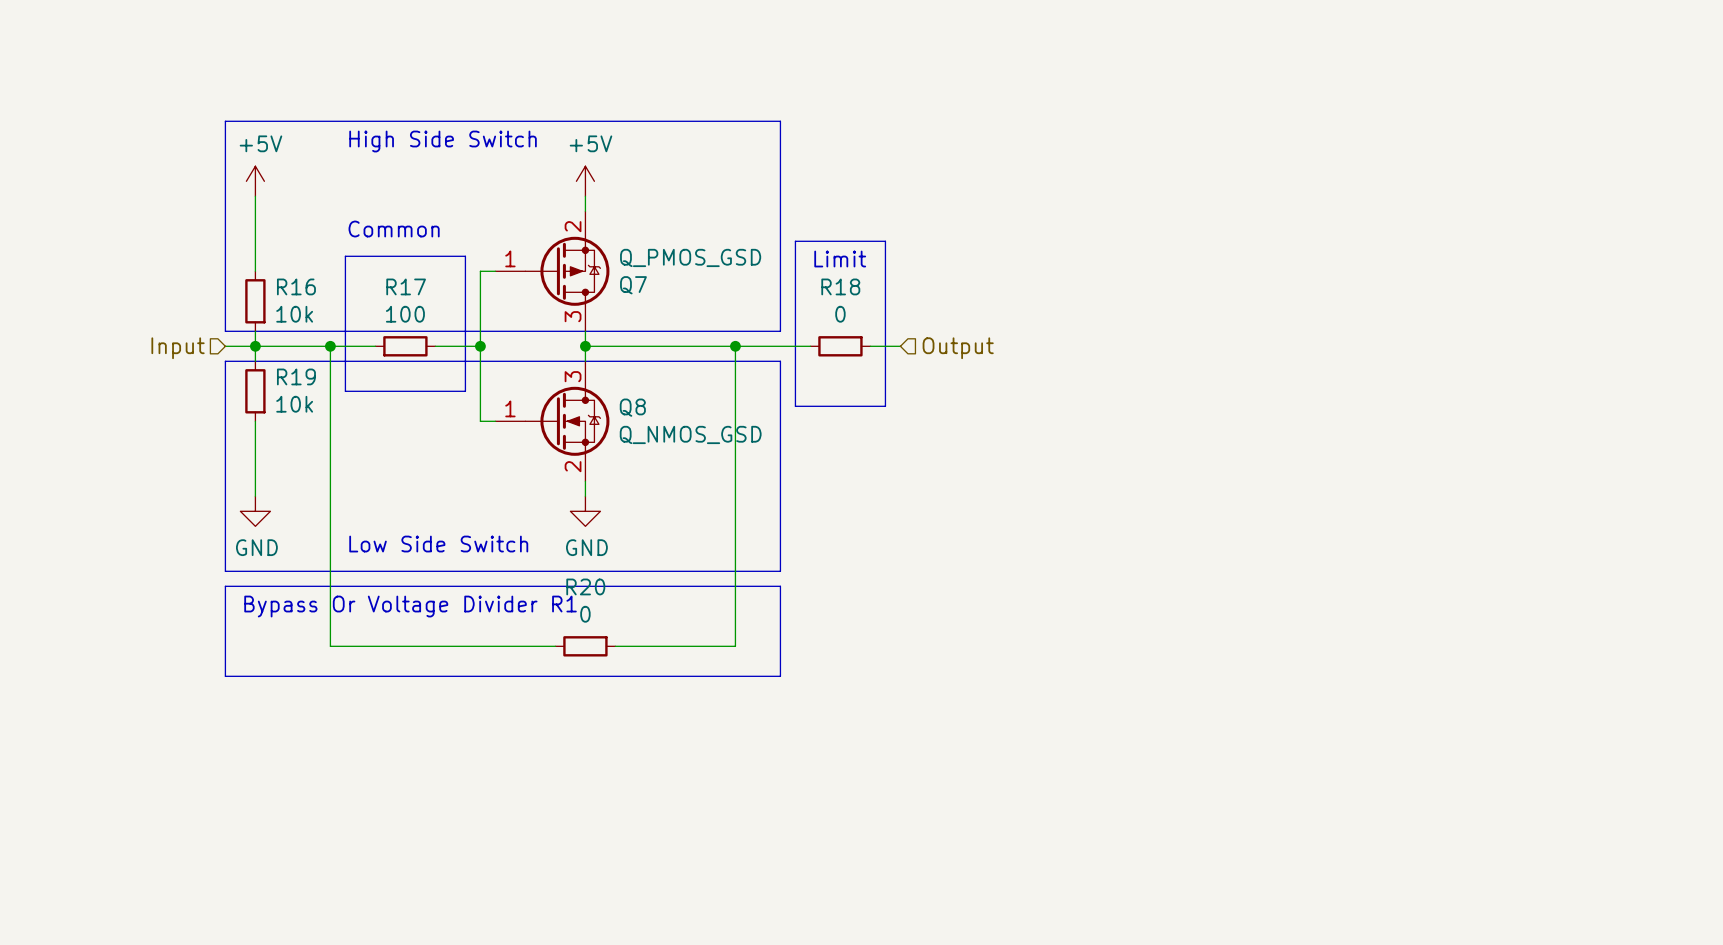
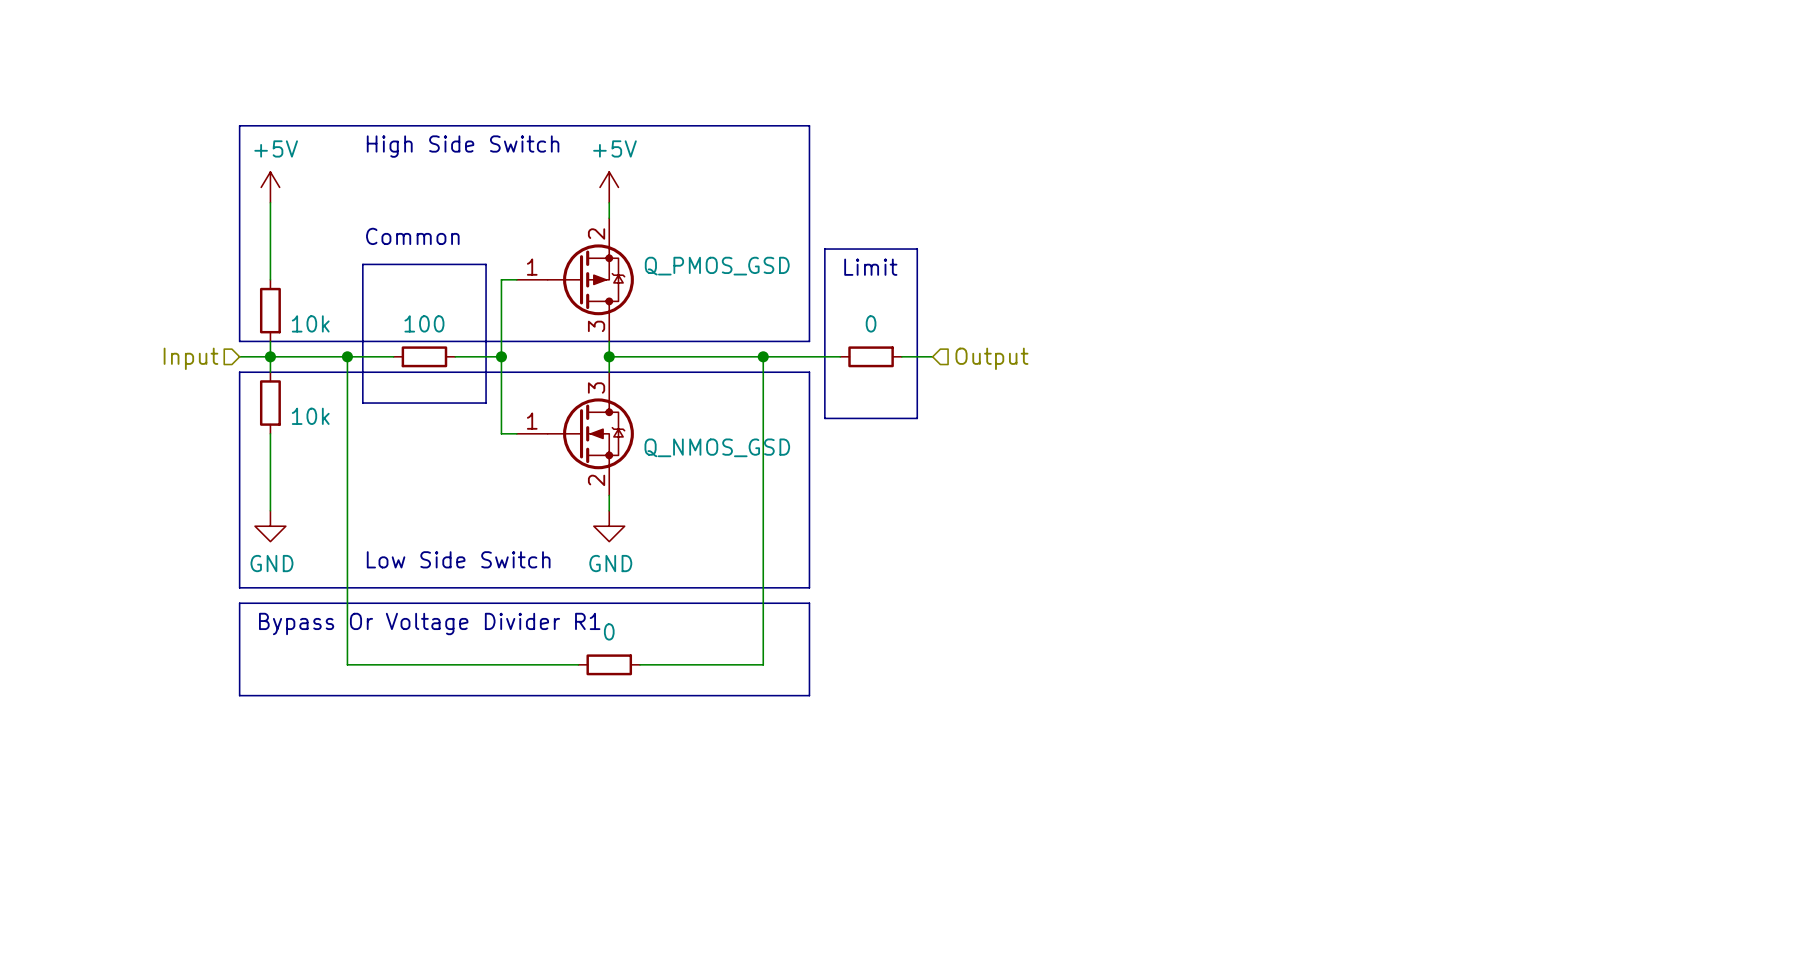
Q7 name: Q7 (633, 285) -> none
R16 name: R16 (296, 286) -> none
R17 name: R17 (406, 286) -> none
R18 name: R18 (840, 286) -> none
R19 name: R19 (296, 376) -> none
Q8 name: Q8 (632, 407) -> none
R20 name: R20 (585, 586) -> none

